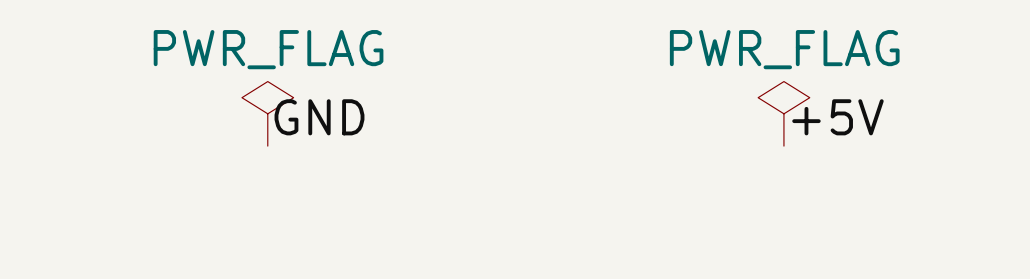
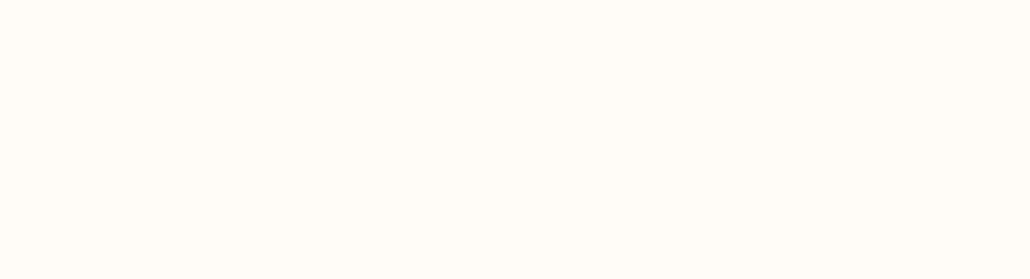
power symbol: PWR_FLAG (267, 113) -> none
power symbol: PWR_FLAG (783, 113) -> none
label: GND (319, 117) -> none
label: +5V (837, 117) -> none

